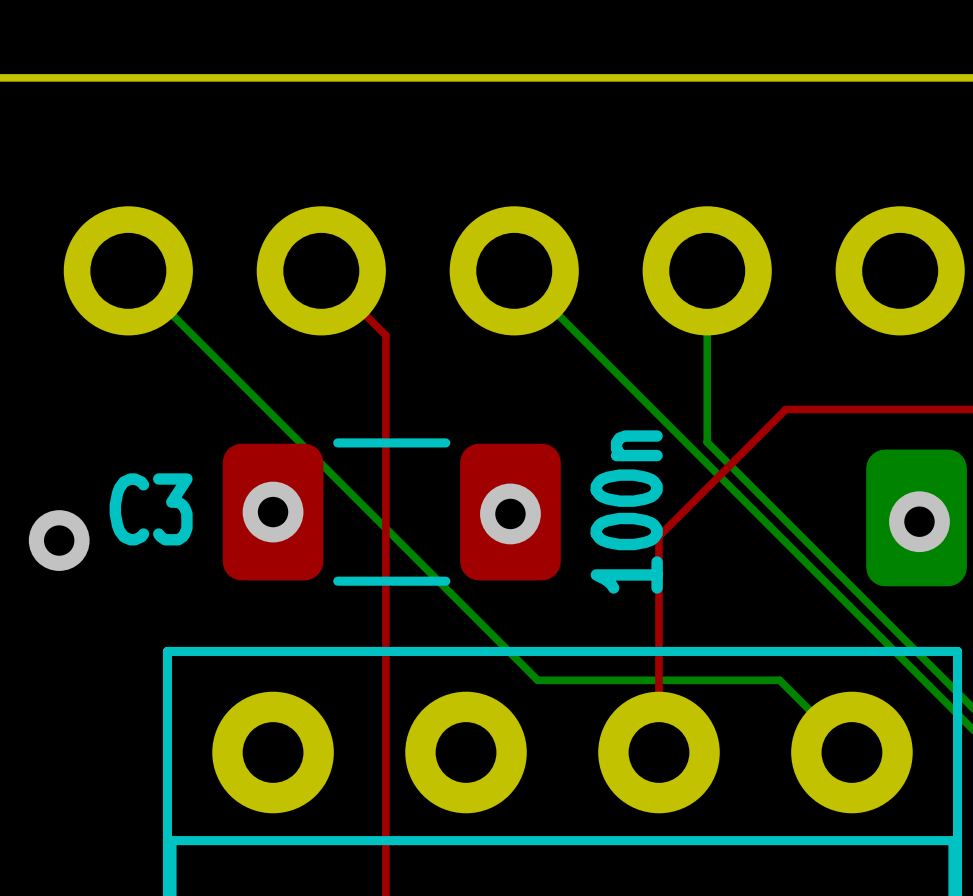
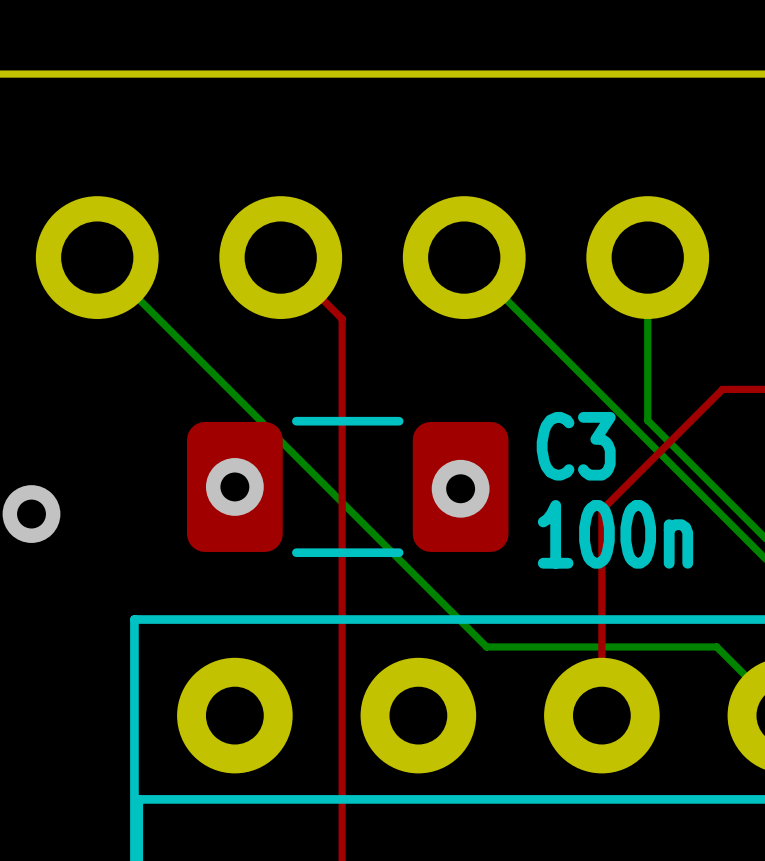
C3 name position: C3 (151, 509) -> C3 (576, 446)
text rotation: 0° (626, 512) -> 90° clockwise (615, 534)

